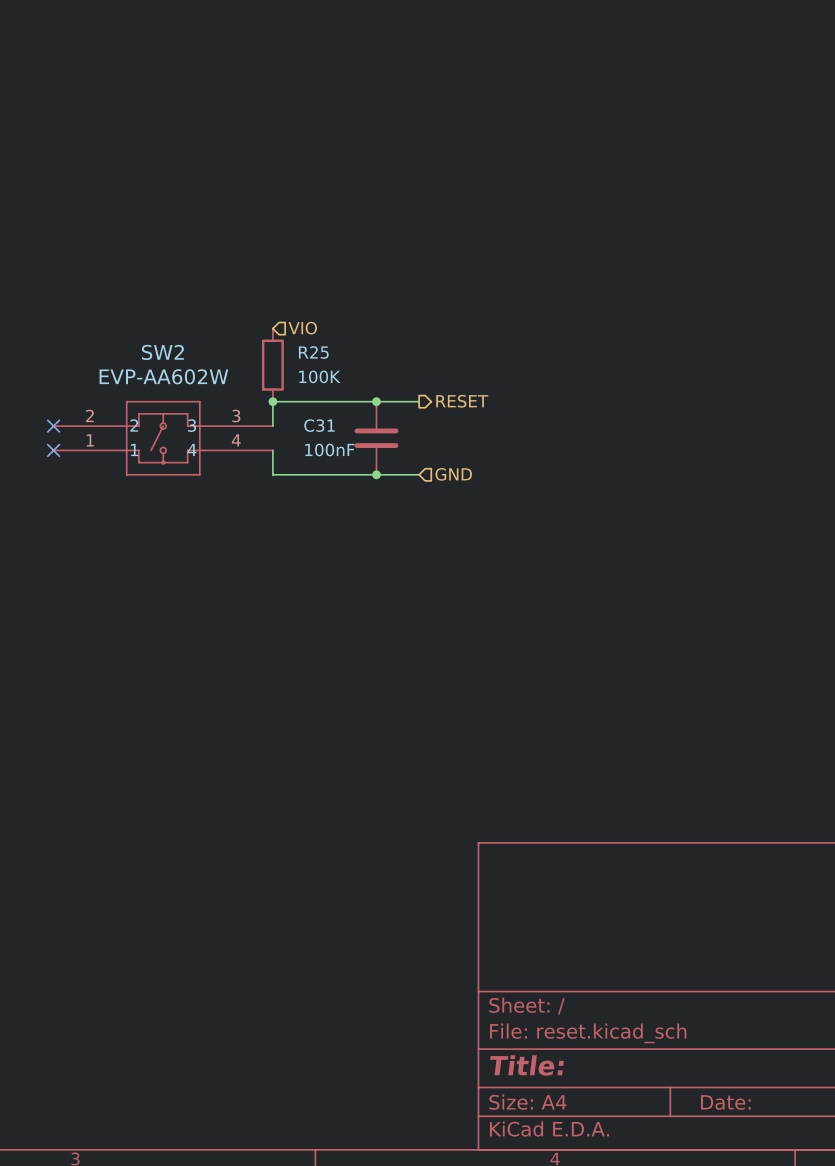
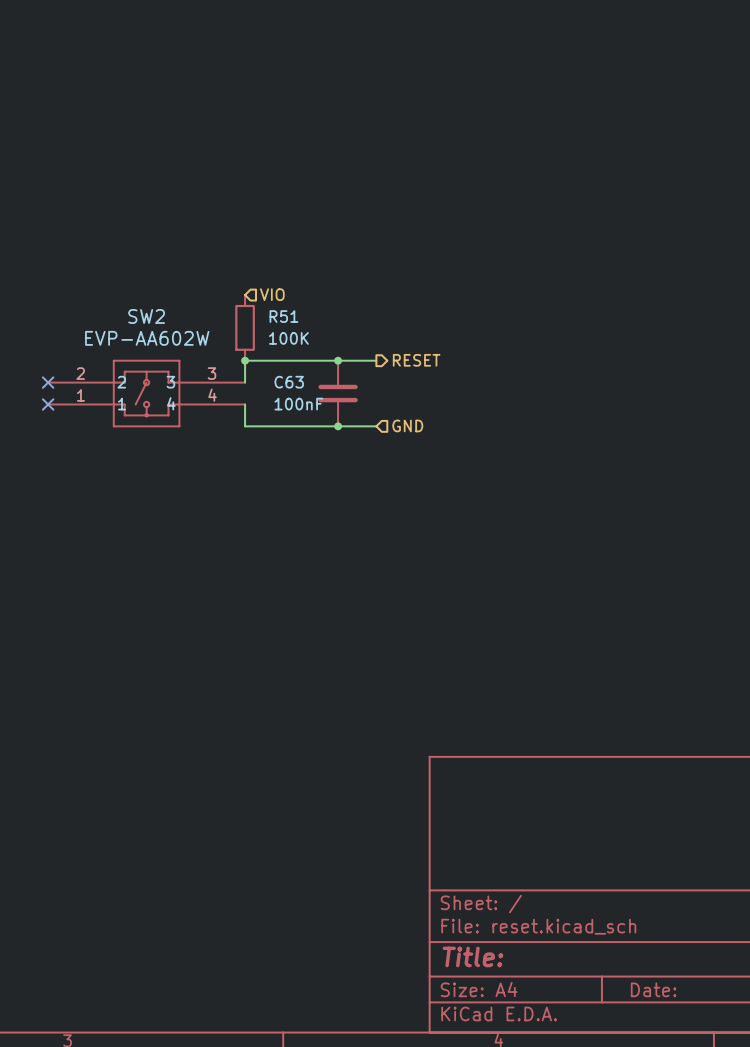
R25 name: R25 (313, 352) -> R51 (283, 316)
C31 name: C31 (319, 425) -> C63 (289, 382)

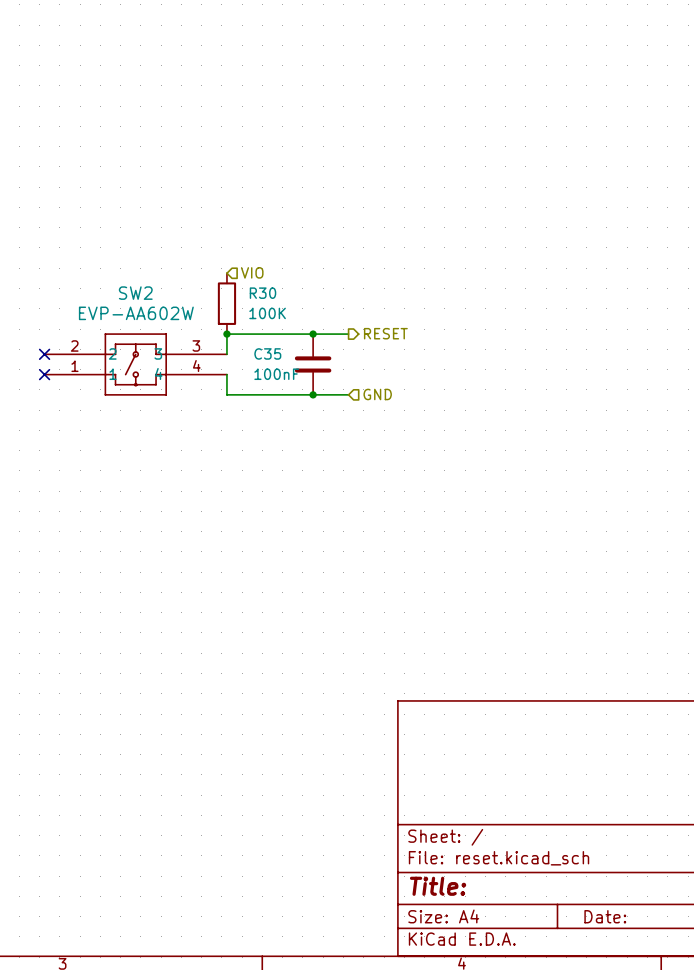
R51 name: R51 (283, 316) -> R30 (262, 293)
C63 name: C63 (289, 382) -> C35 (267, 353)

